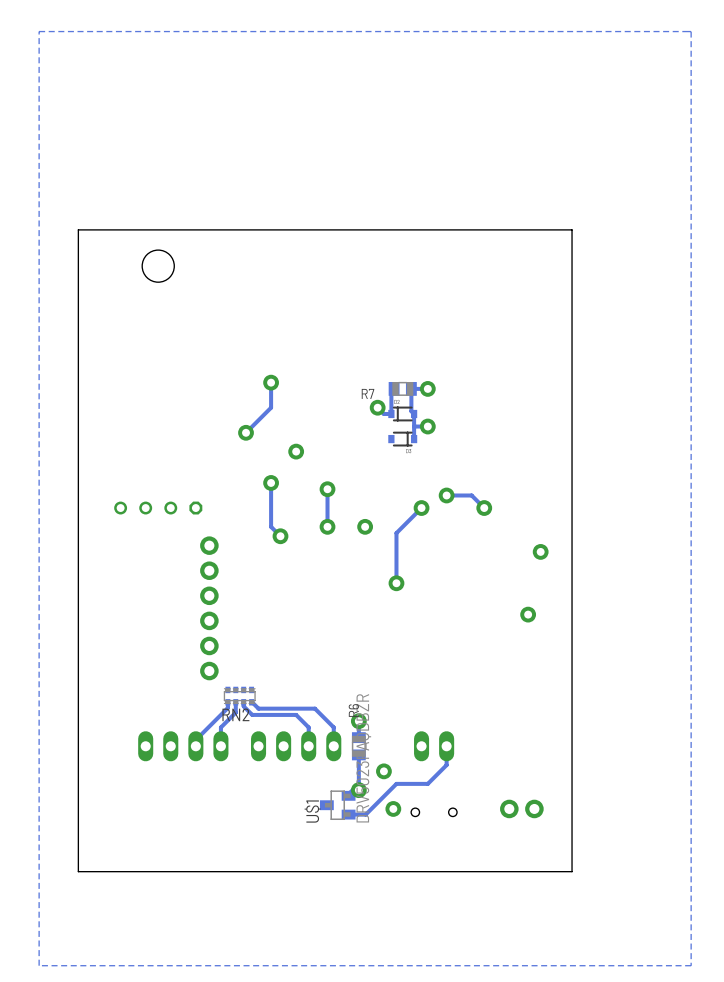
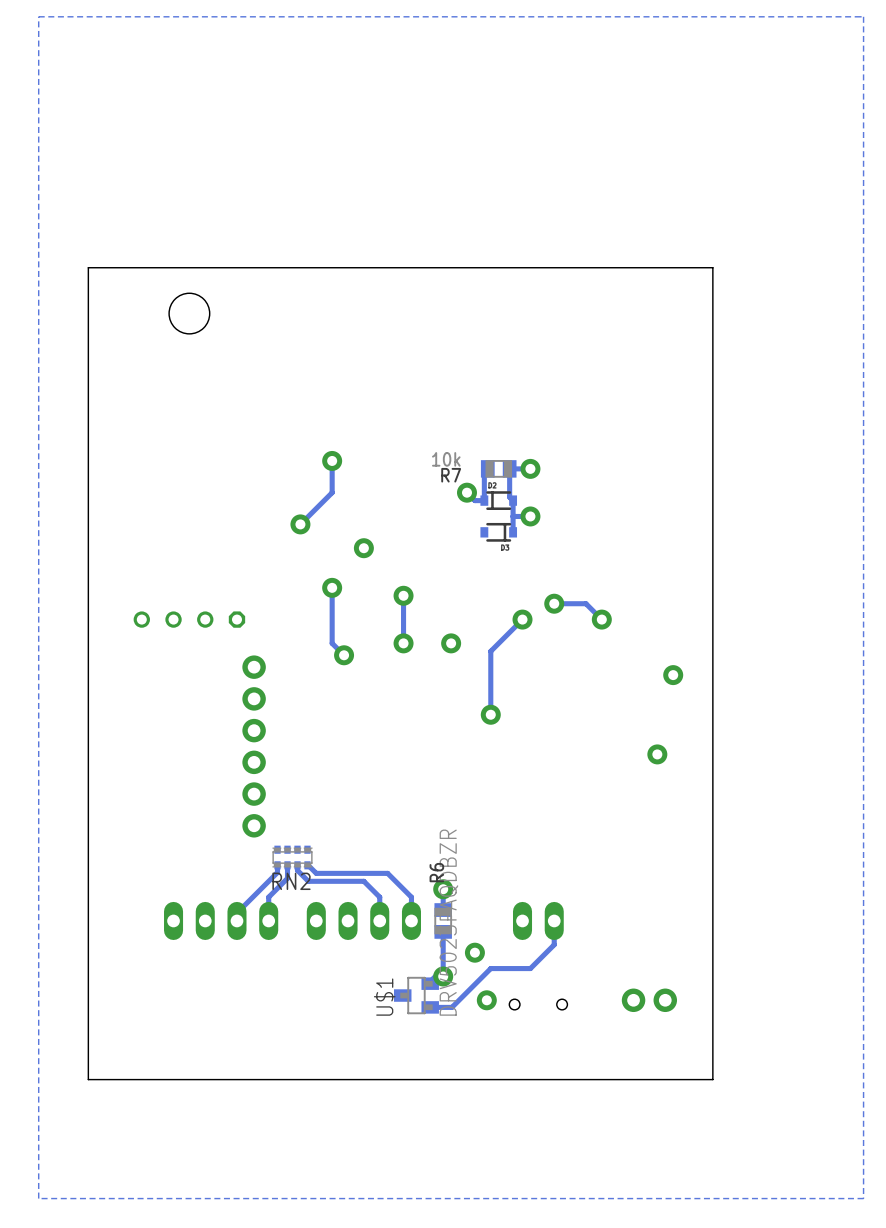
R7 value: none -> 10k (446, 459)

